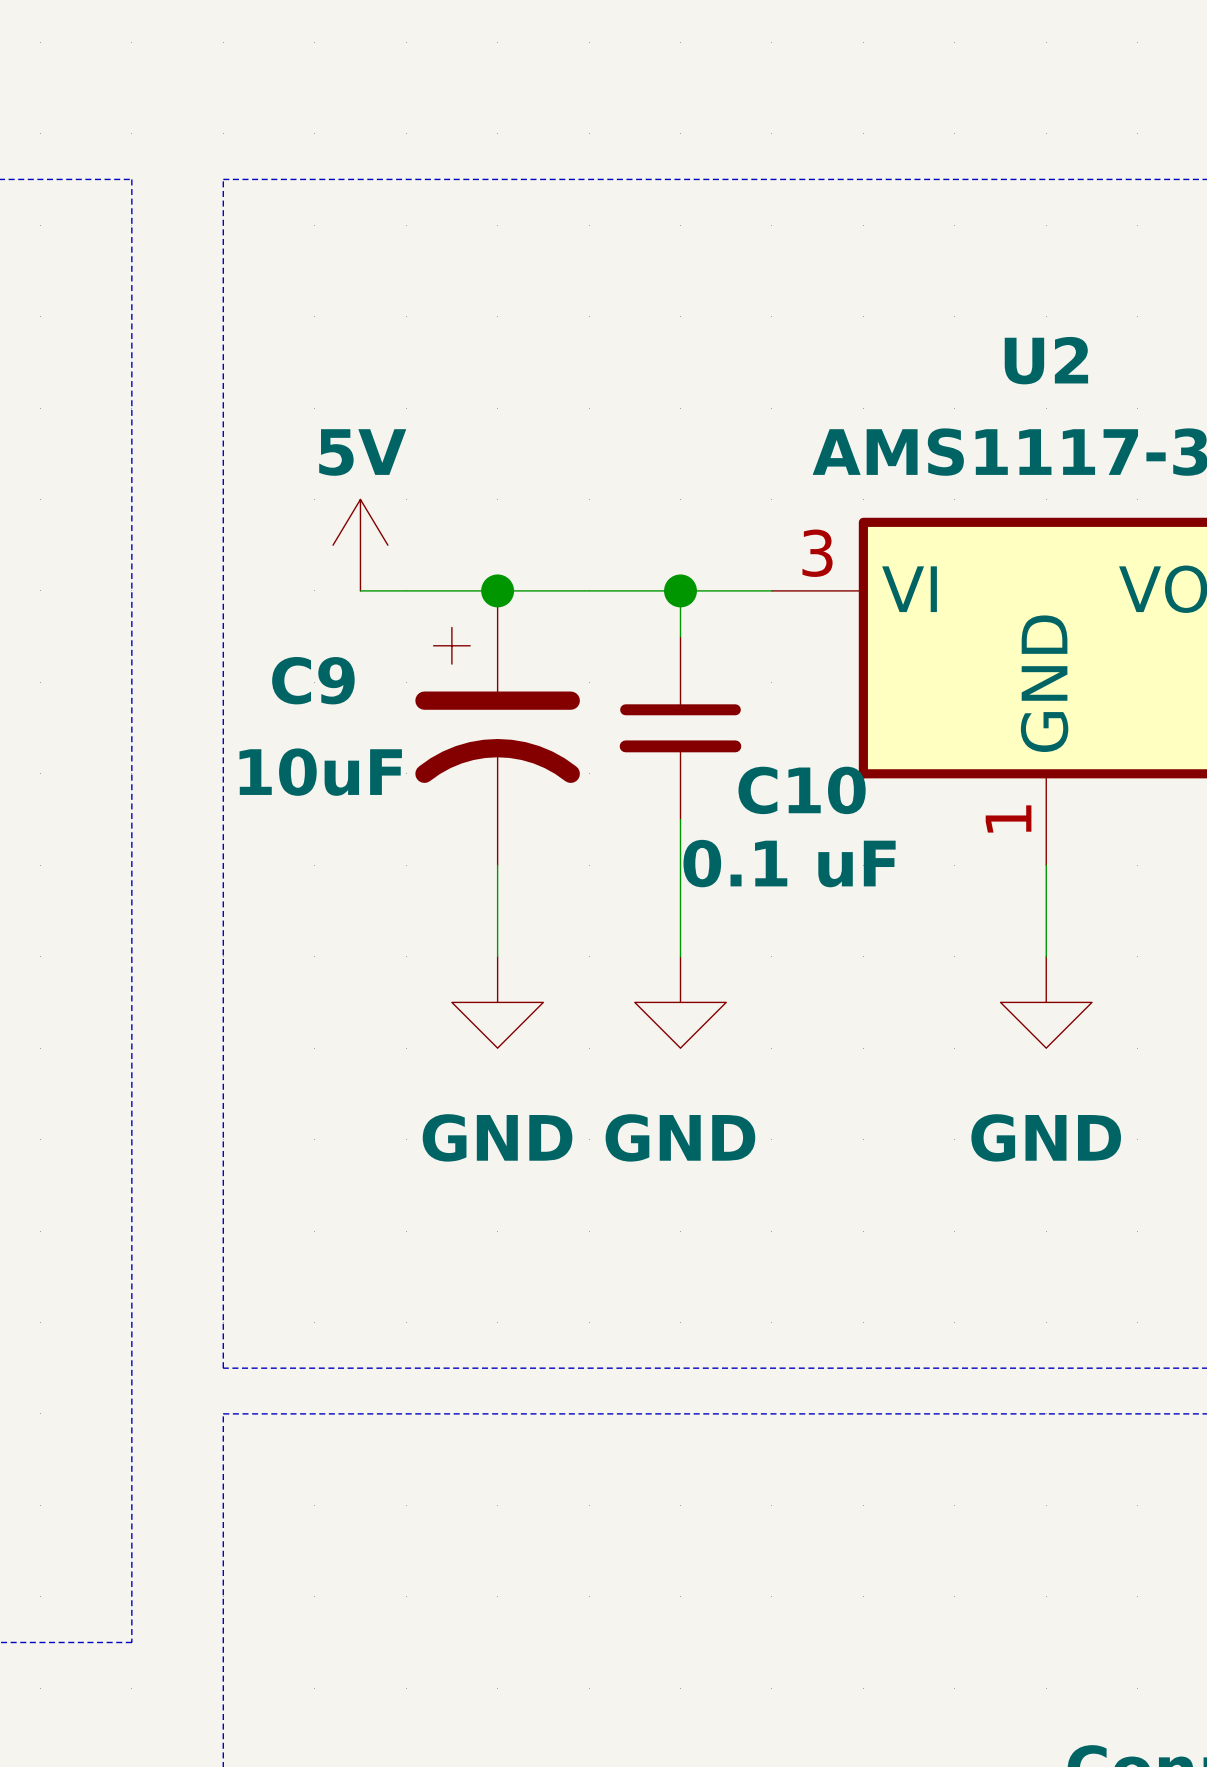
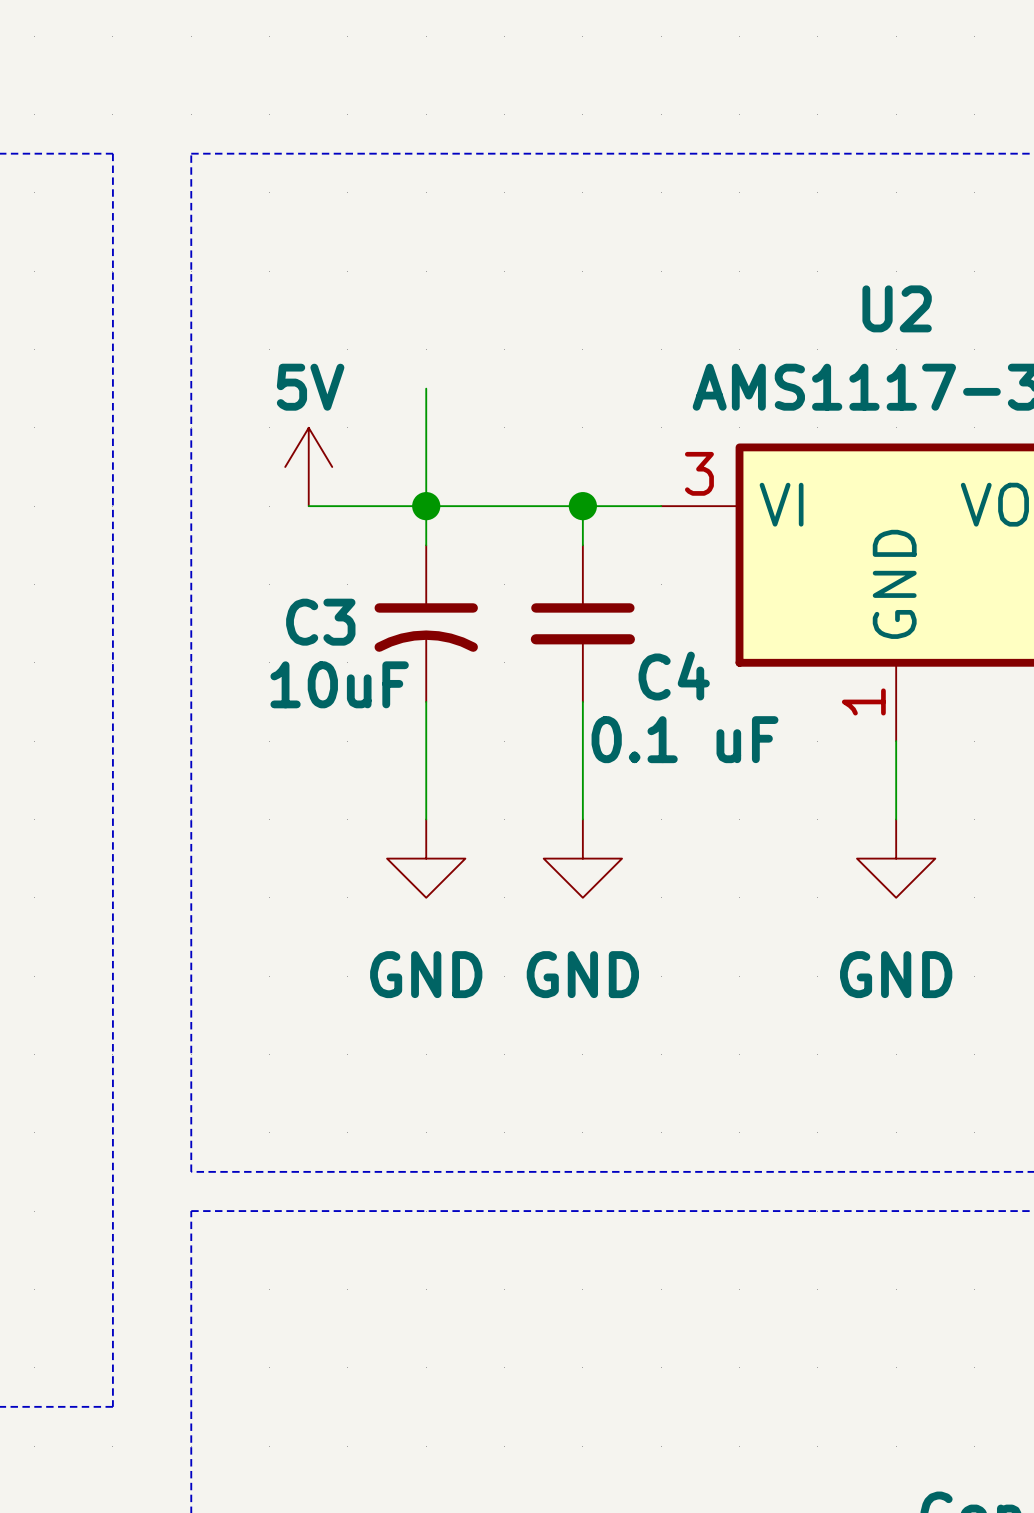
wire: none -> (426, 388) (426, 545)
C9: 10uF (497, 728) -> none
C3: none -> 10uF (426, 623)
C10 name: C10 (802, 790) -> C4 (674, 676)

